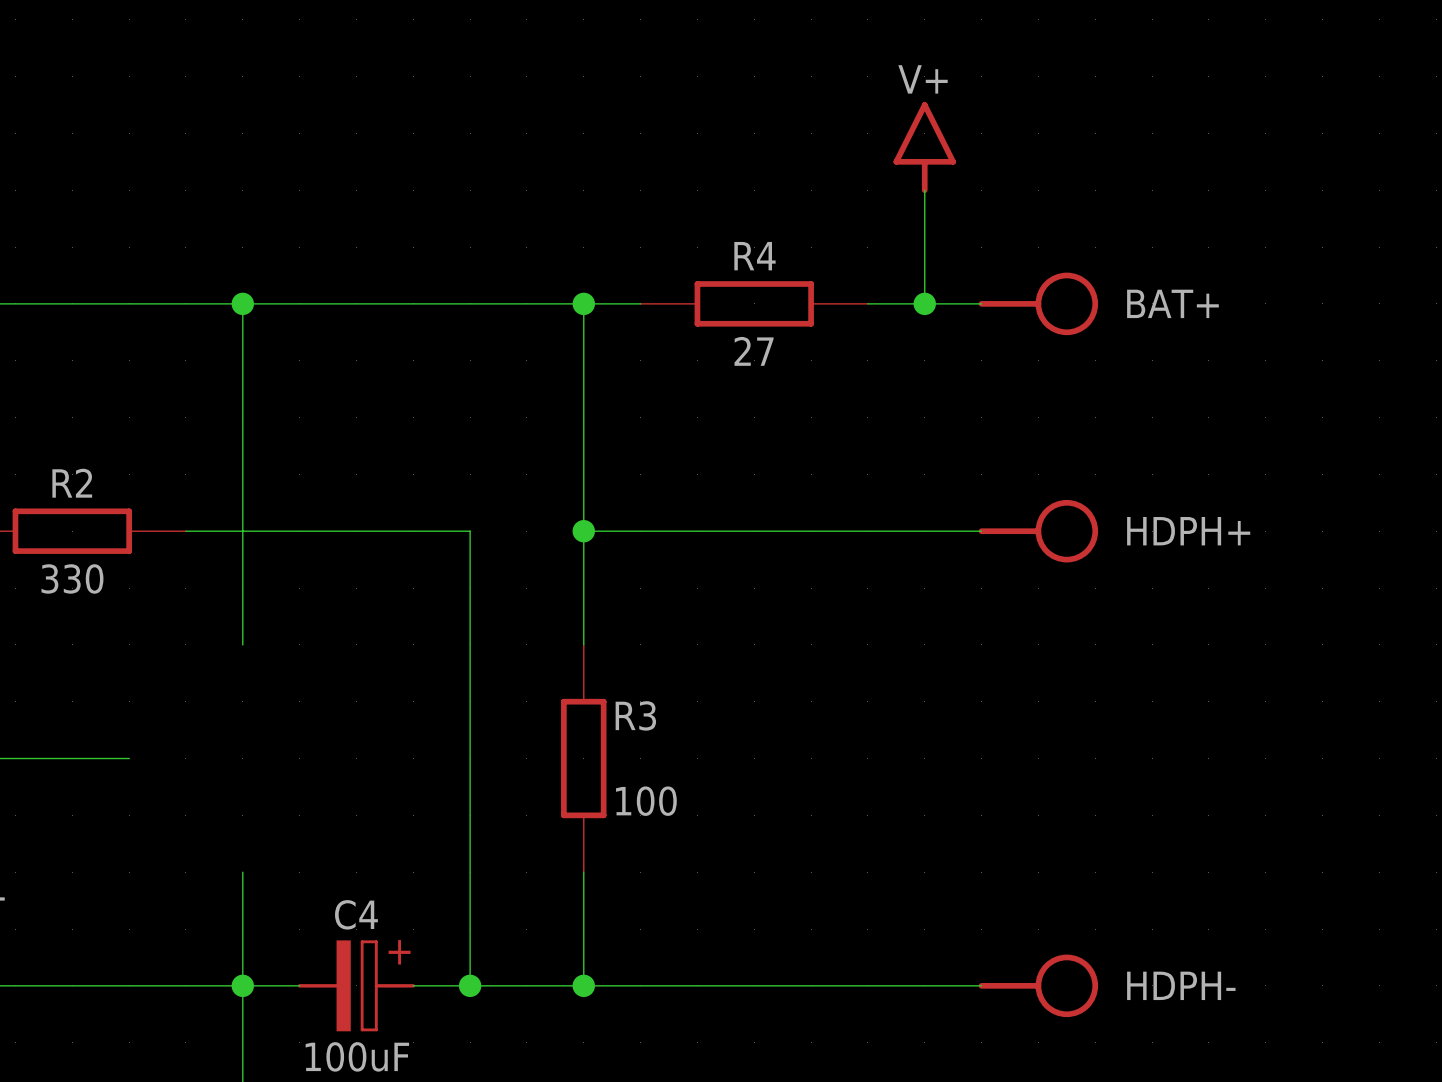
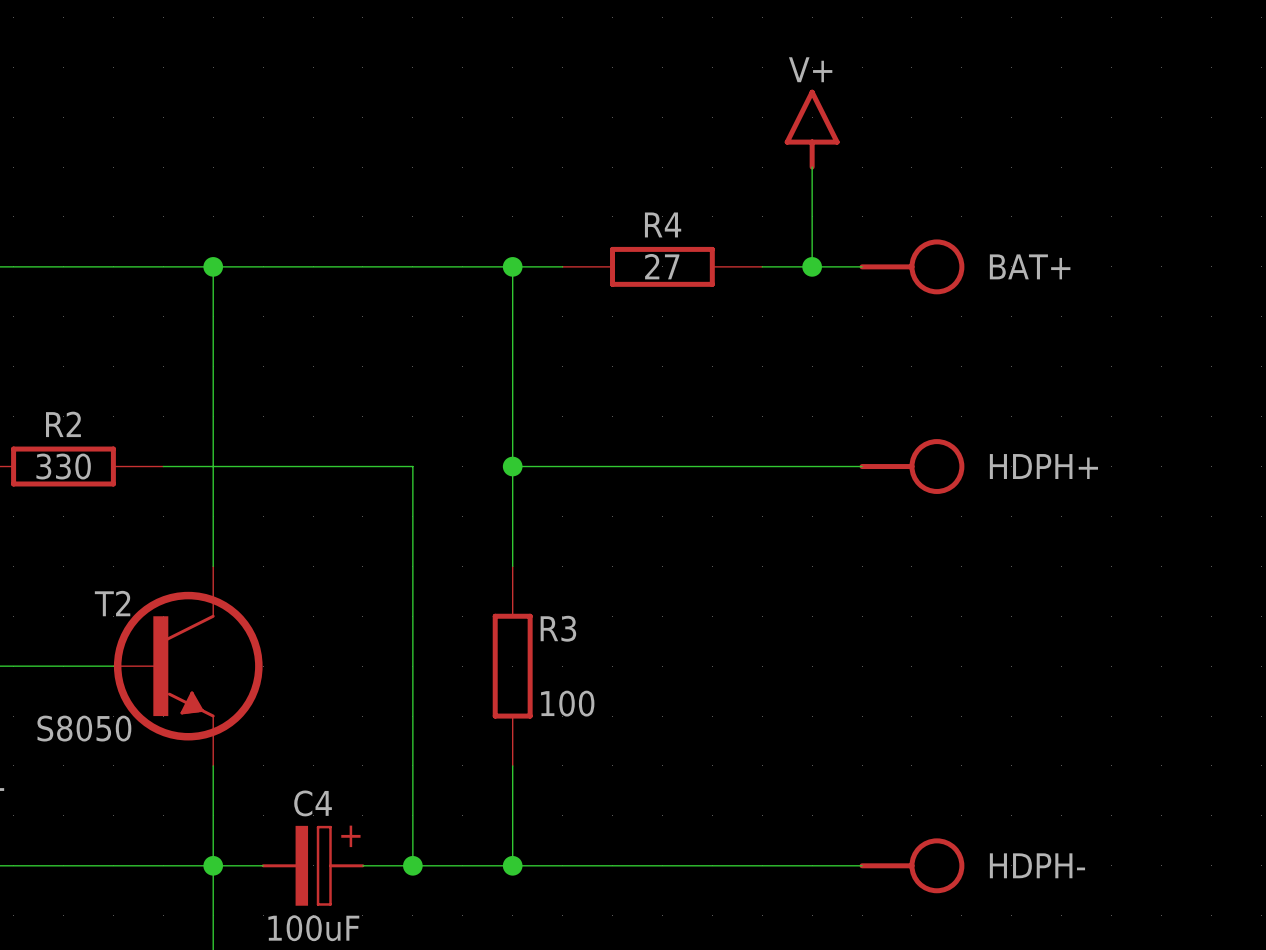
R4 value position: 27 (754, 351) -> 27 (662, 266)
R2 value position: 330 (72, 578) -> 330 (63, 466)
T2: none -> S8050 (188, 666)

